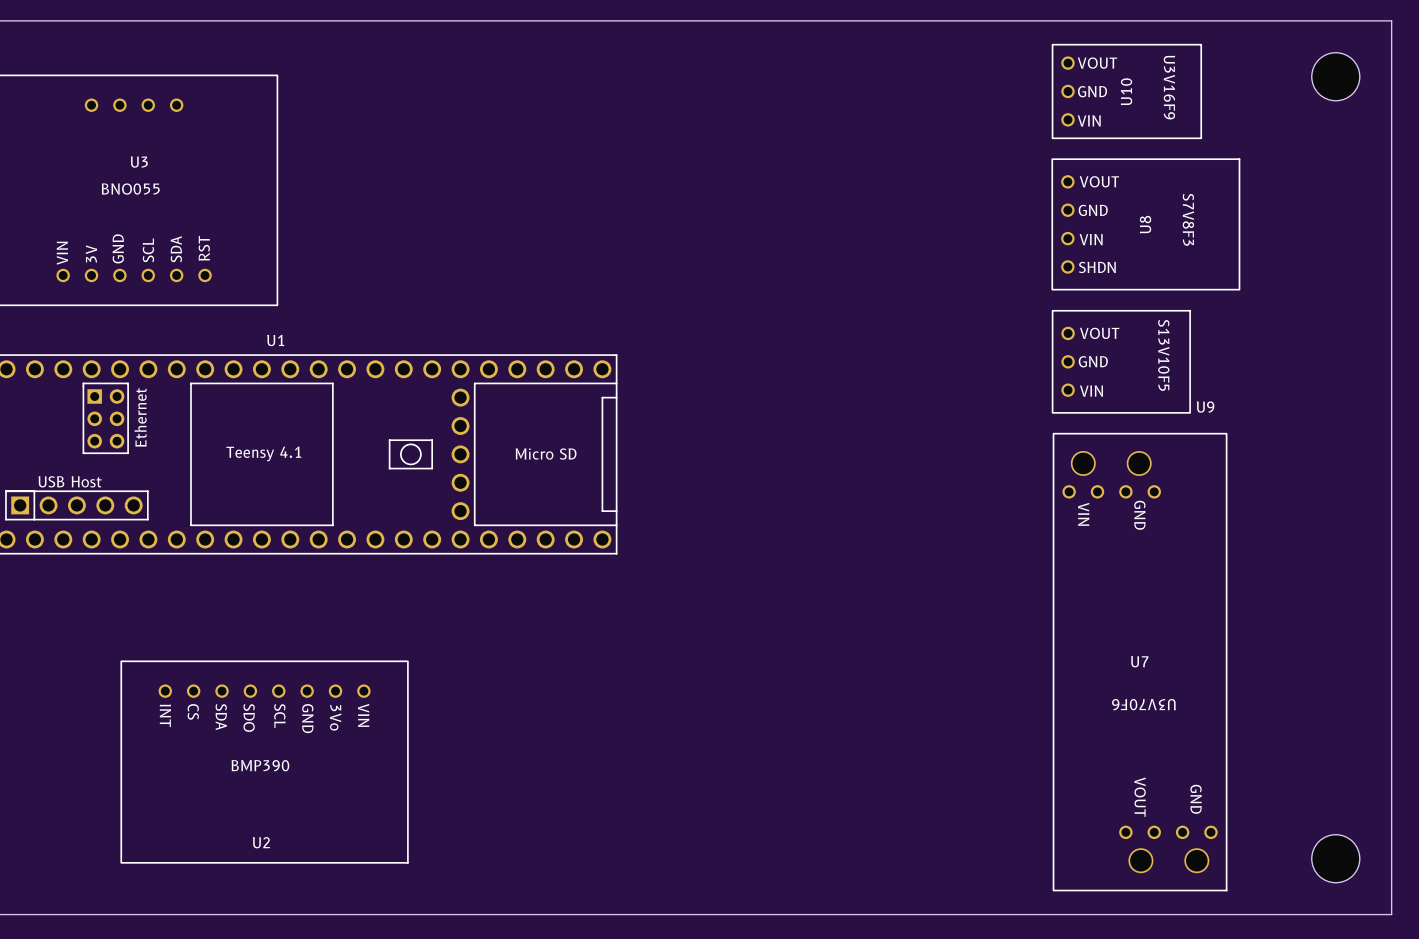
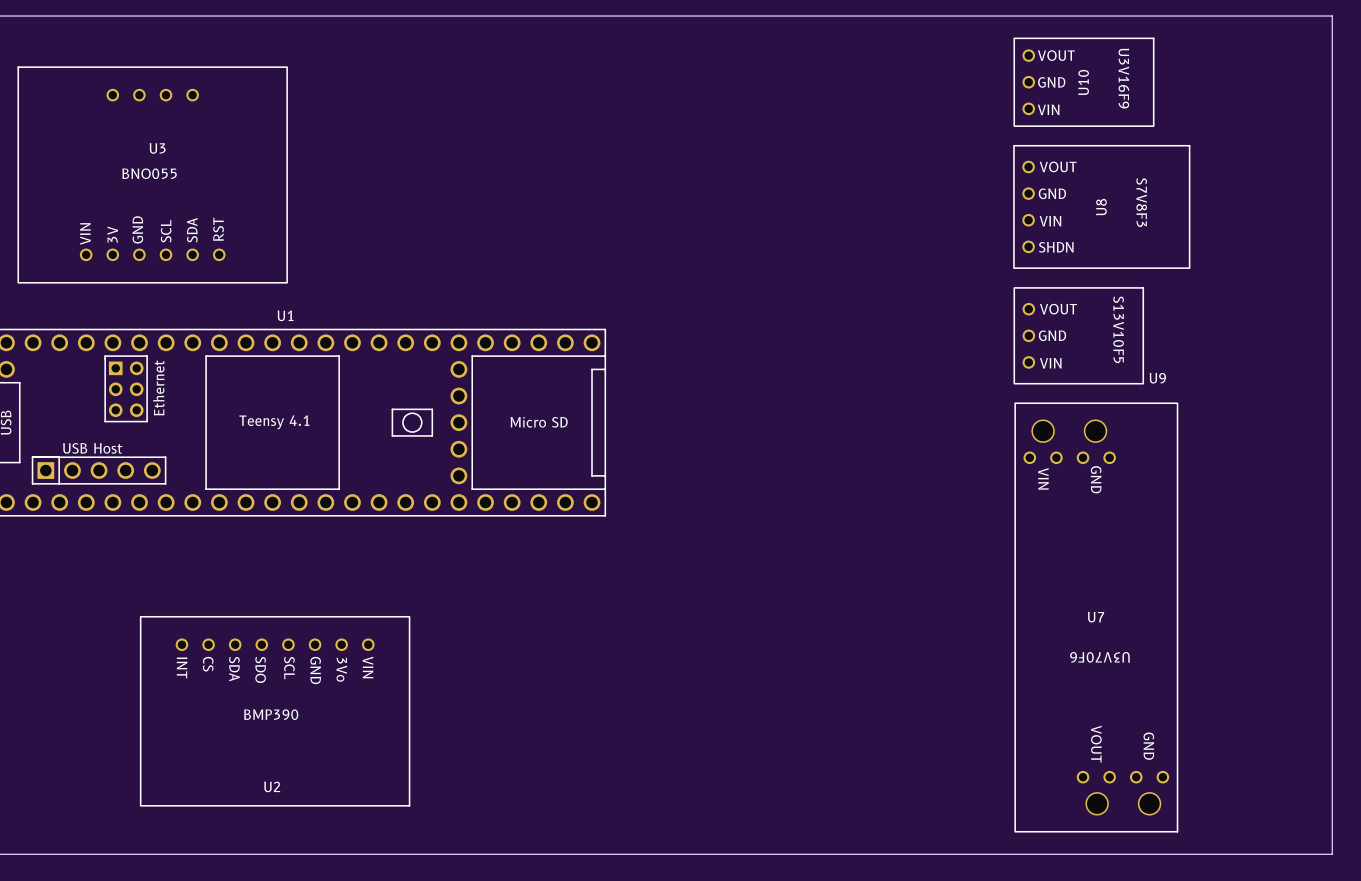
part: (1335, 76) -> none
part: (1335, 858) -> none

